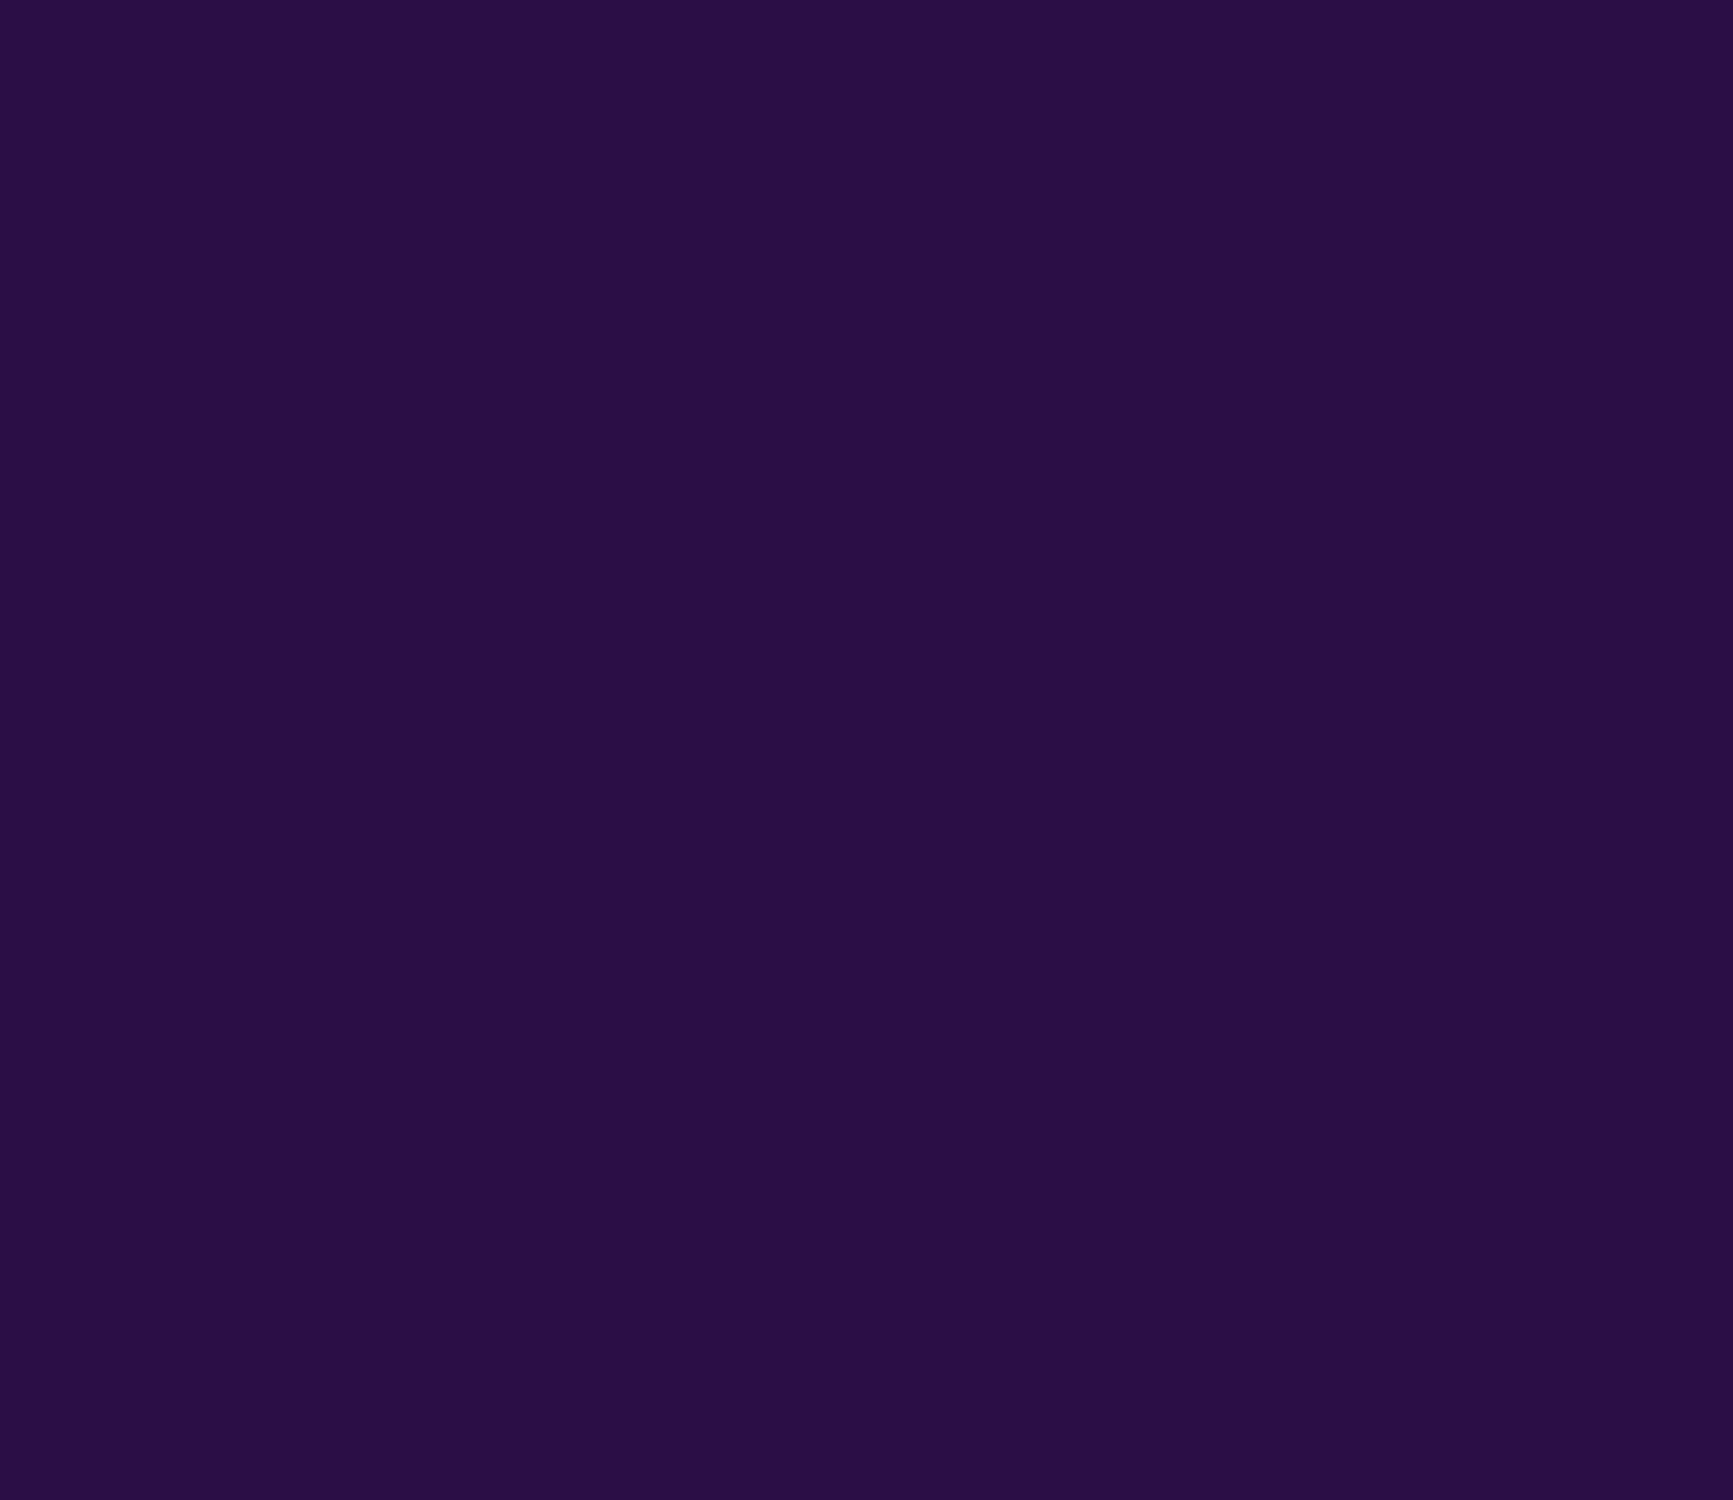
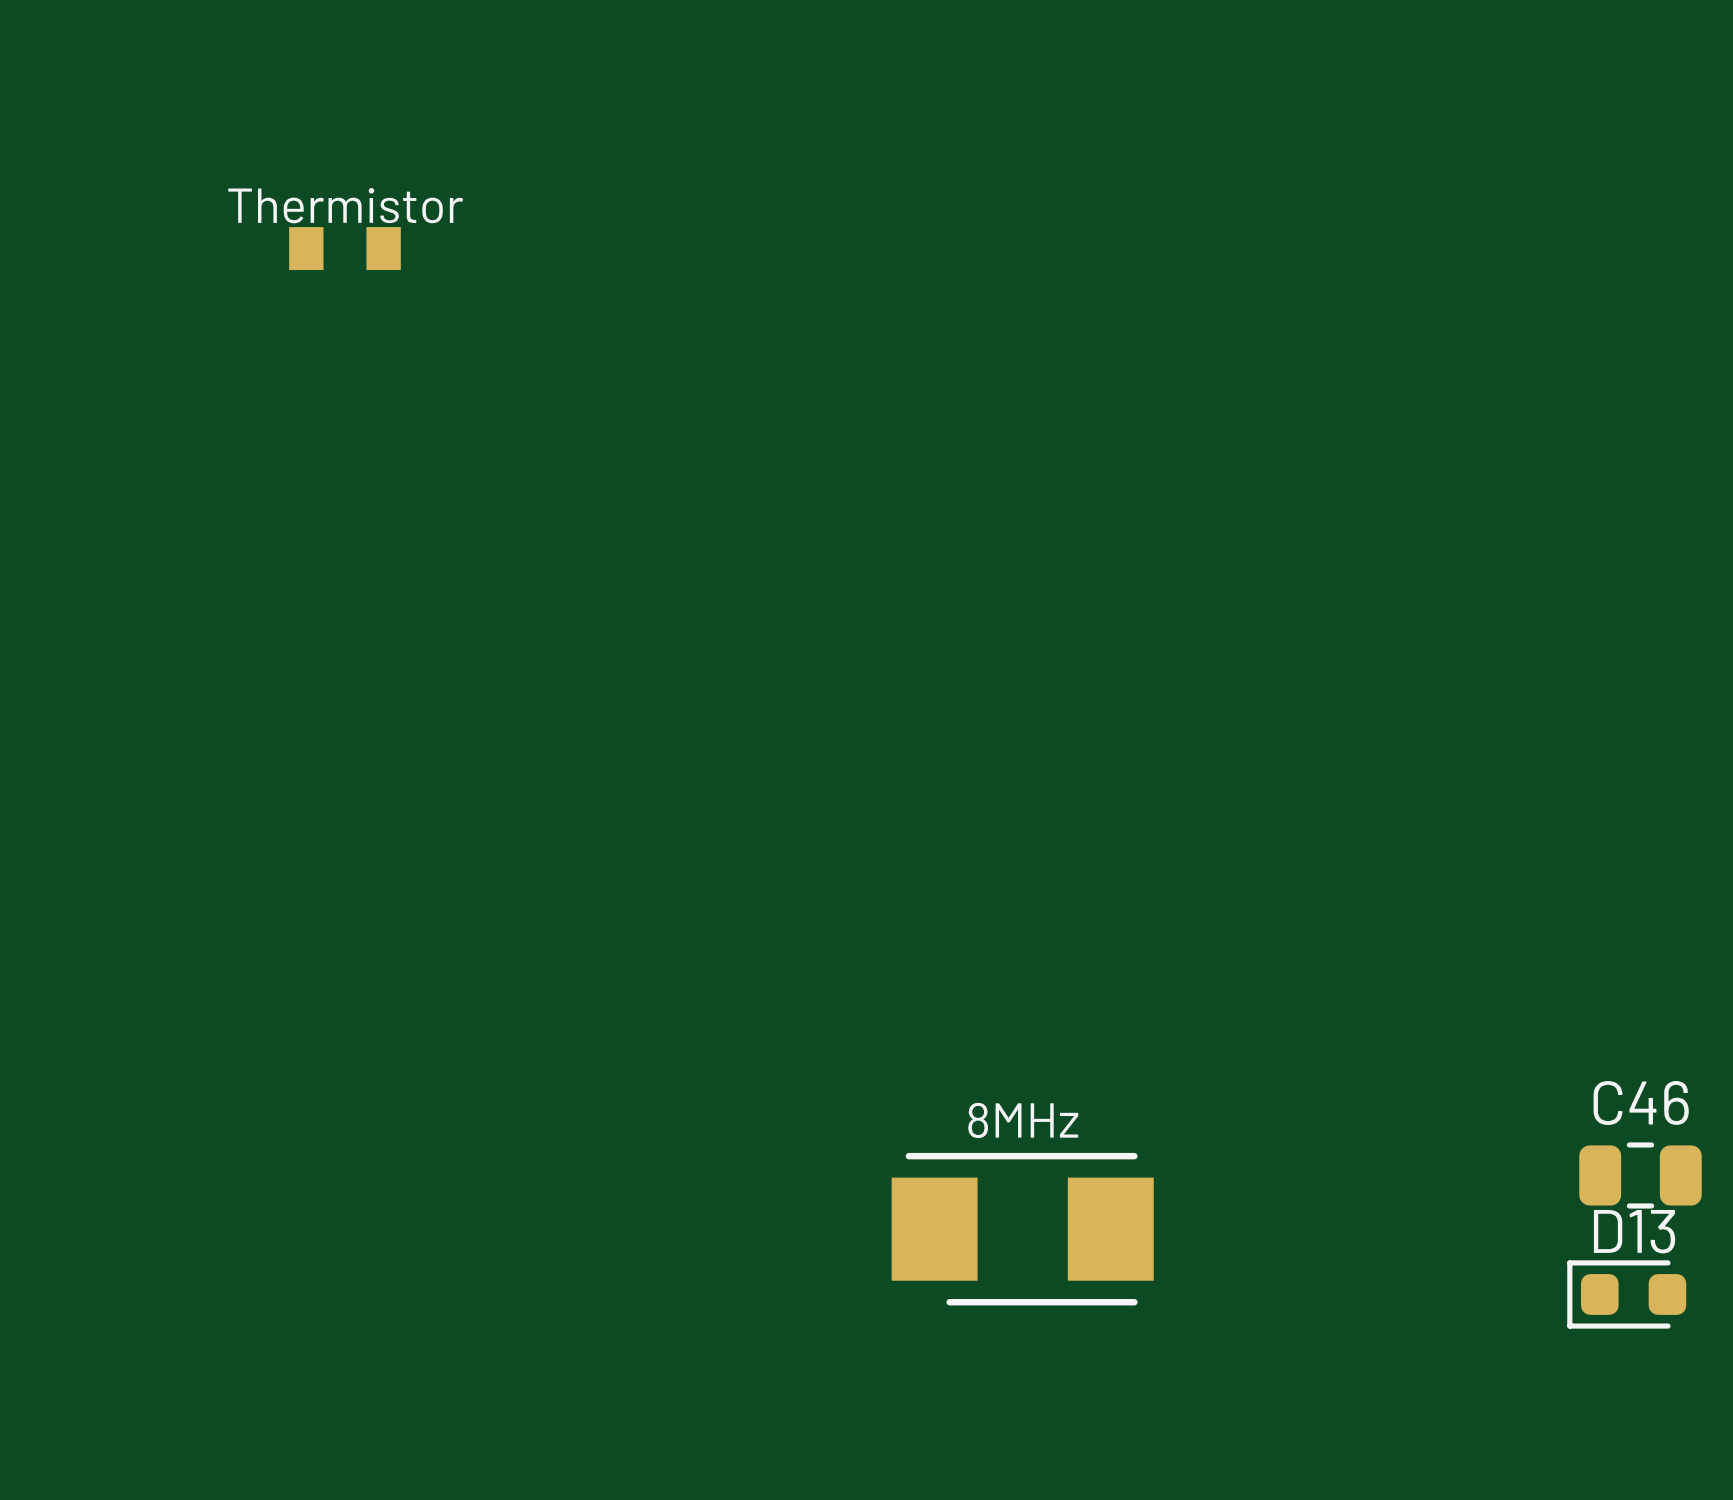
part: none -> Thermistor (344, 248)
C46: none -> (1640, 1175)
part: none -> 8MHz (1022, 1229)
D13: none -> (1626, 1294)

